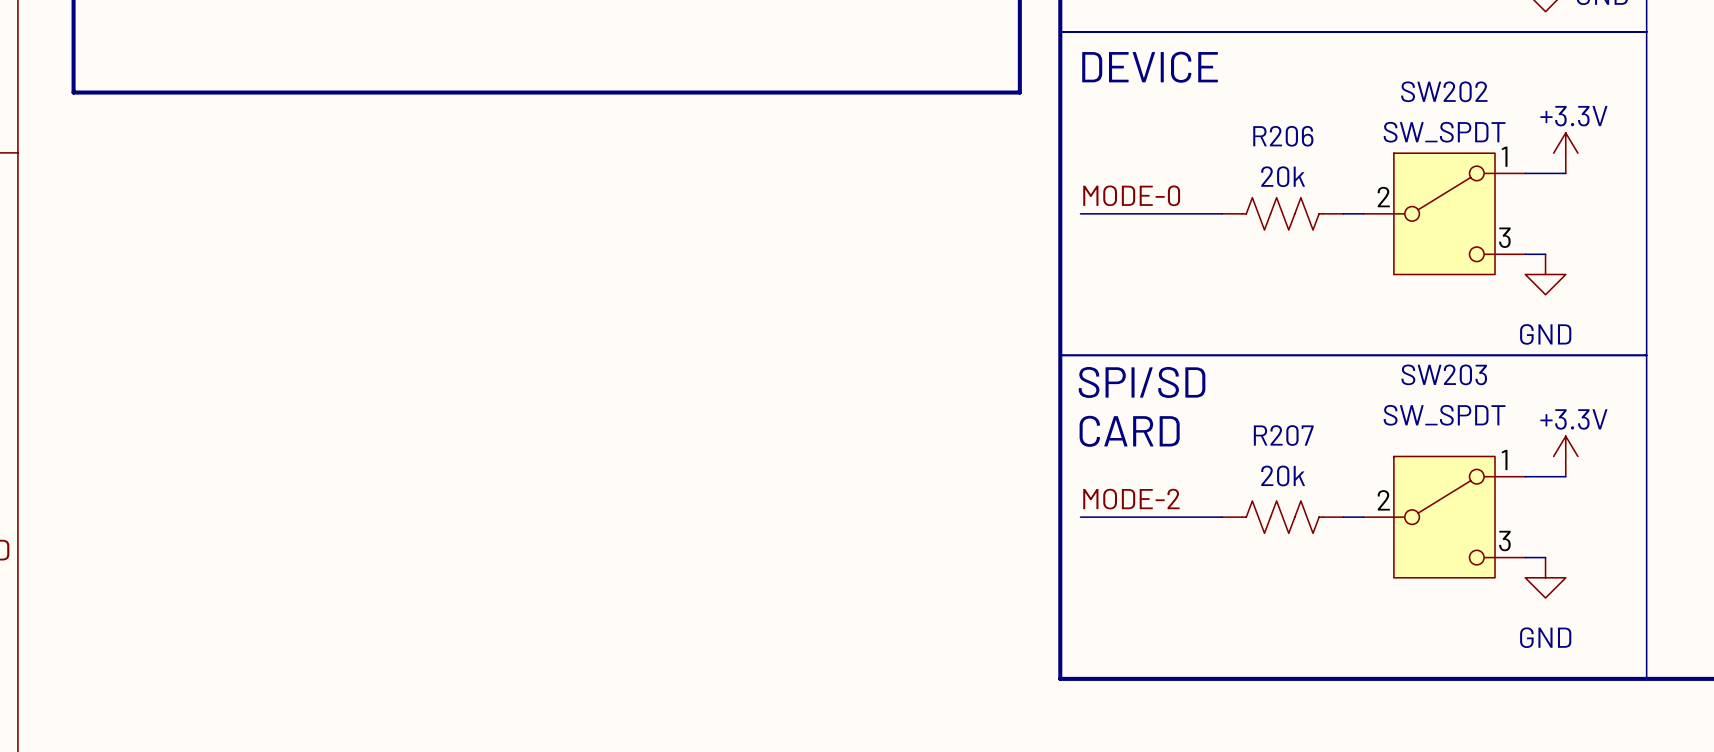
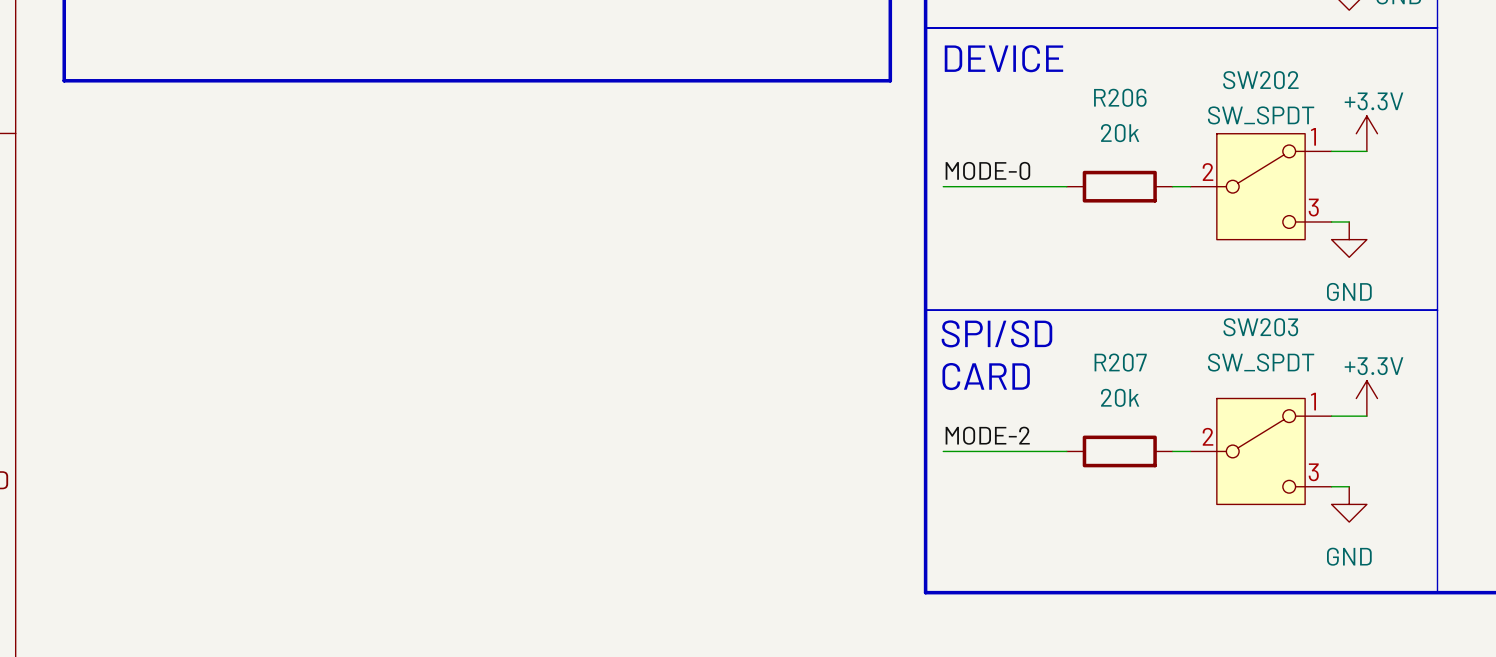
R206 symbol: [1222, 197, 1344, 231] -> [1066, 170, 1173, 203]
R207 symbol: [1222, 500, 1344, 534] -> [1066, 435, 1173, 468]

